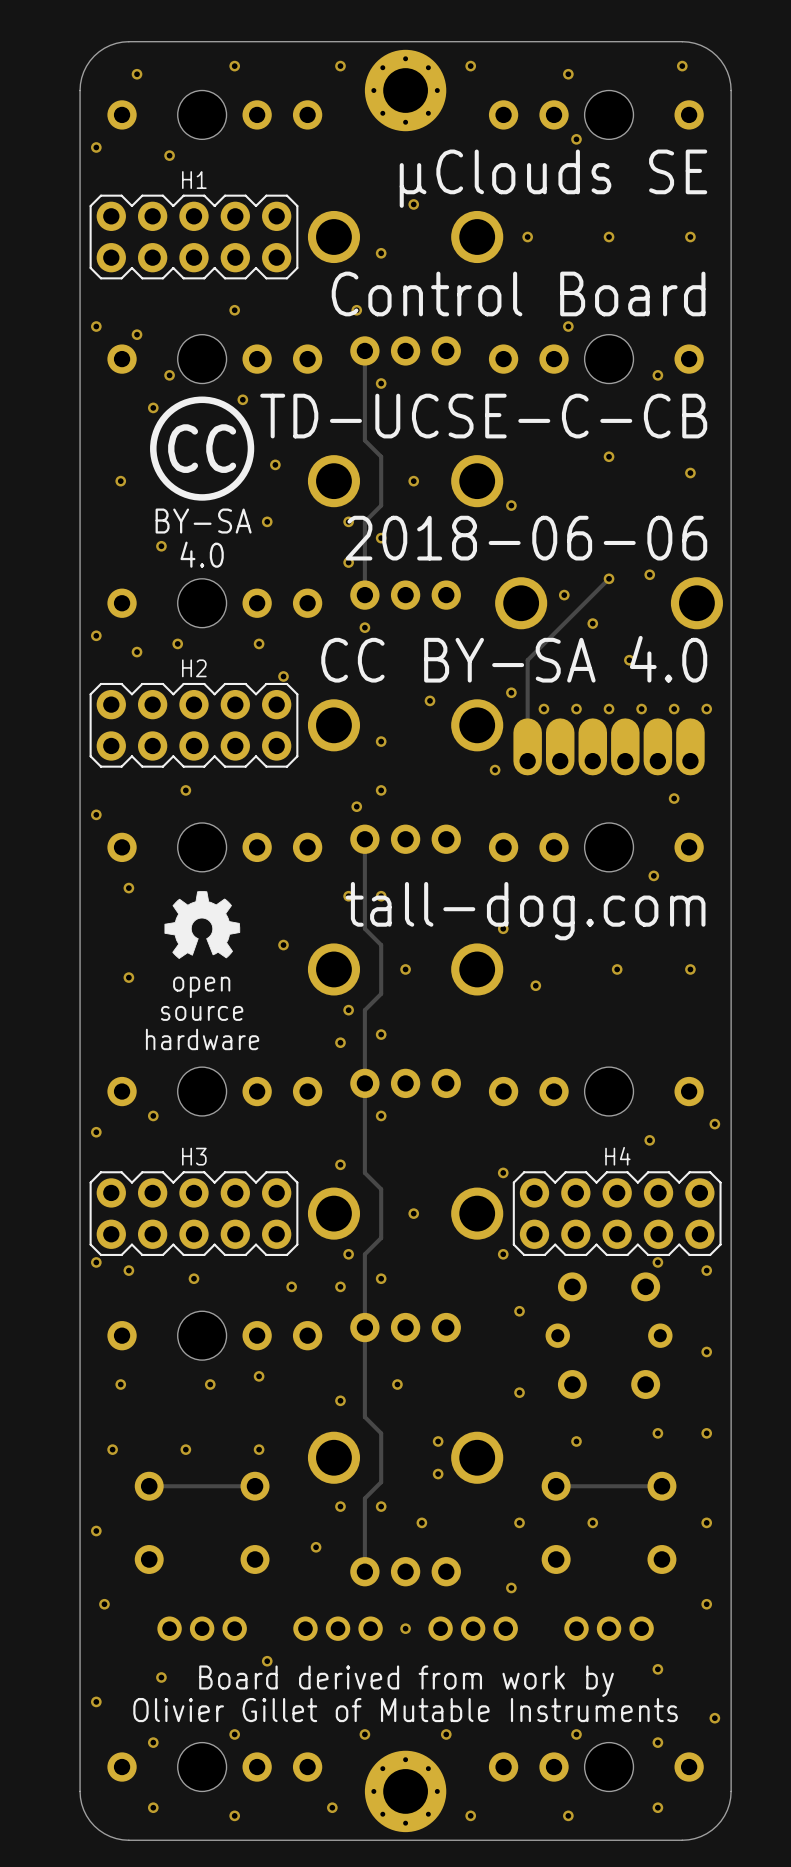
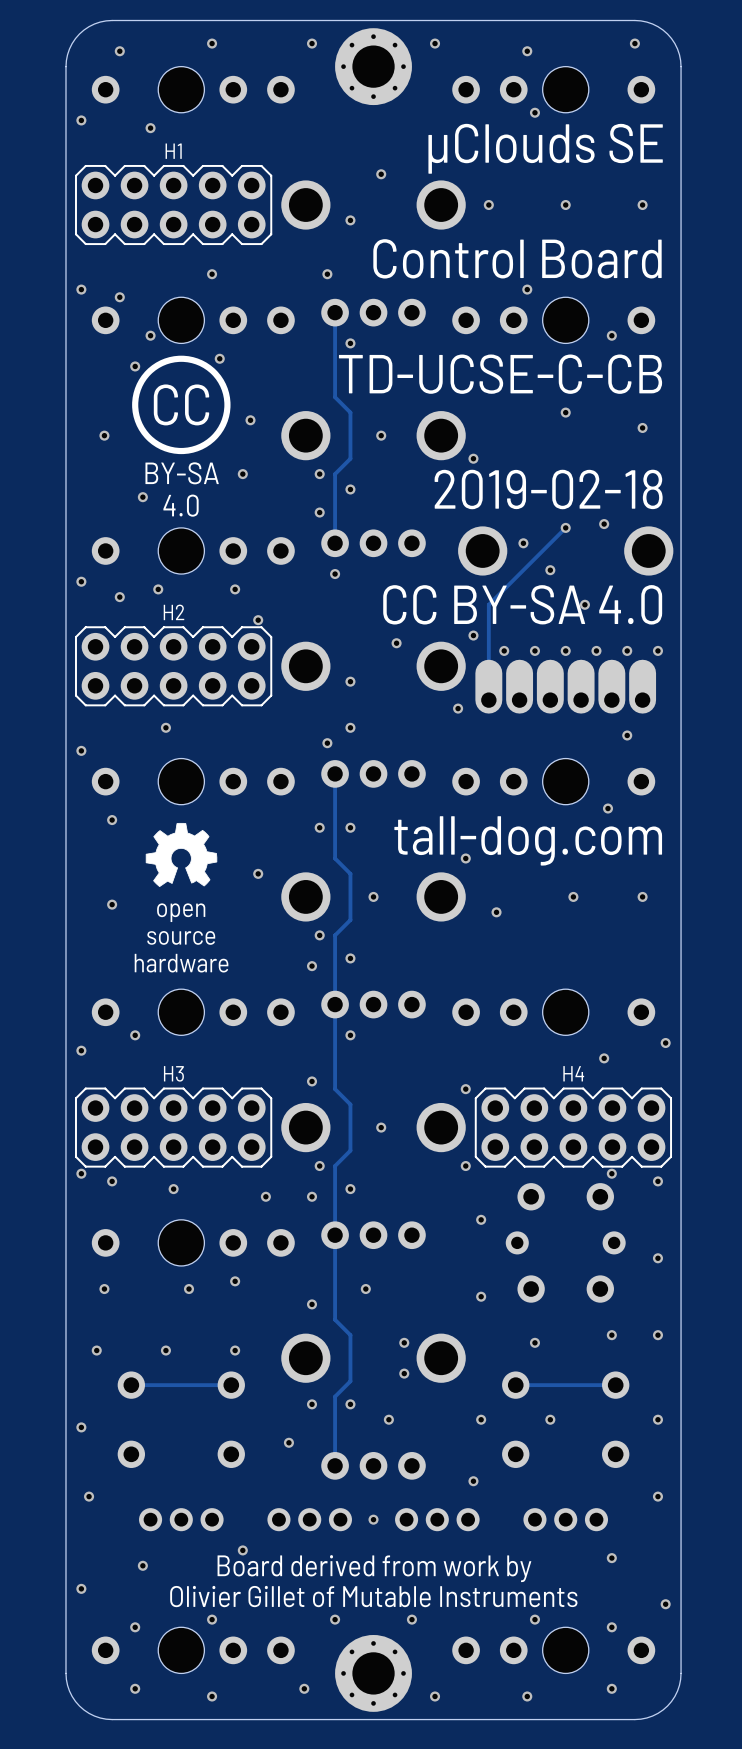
text: 2018-06-06 (526, 538) -> 2019-02-18 (548, 489)

